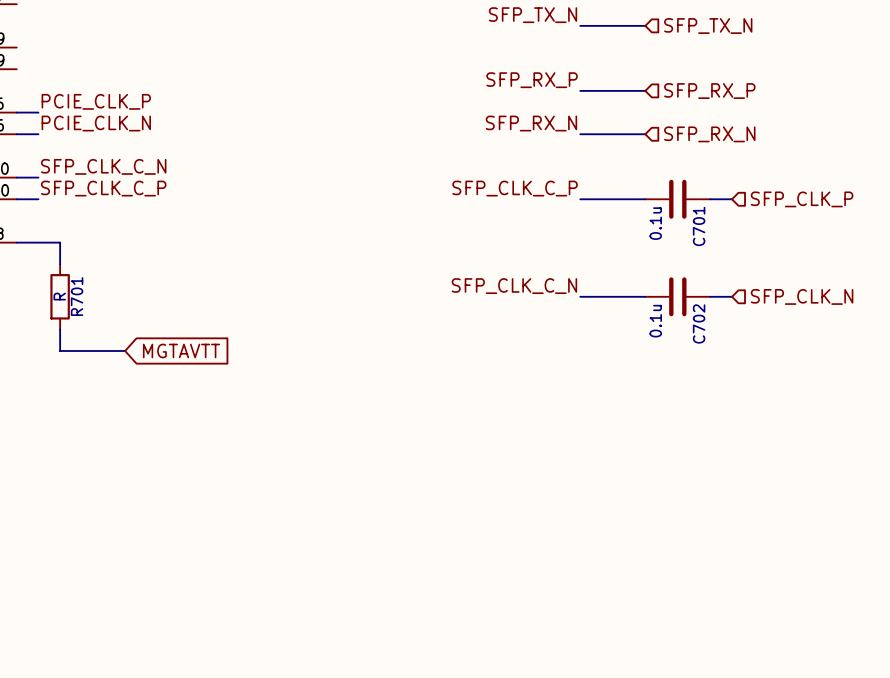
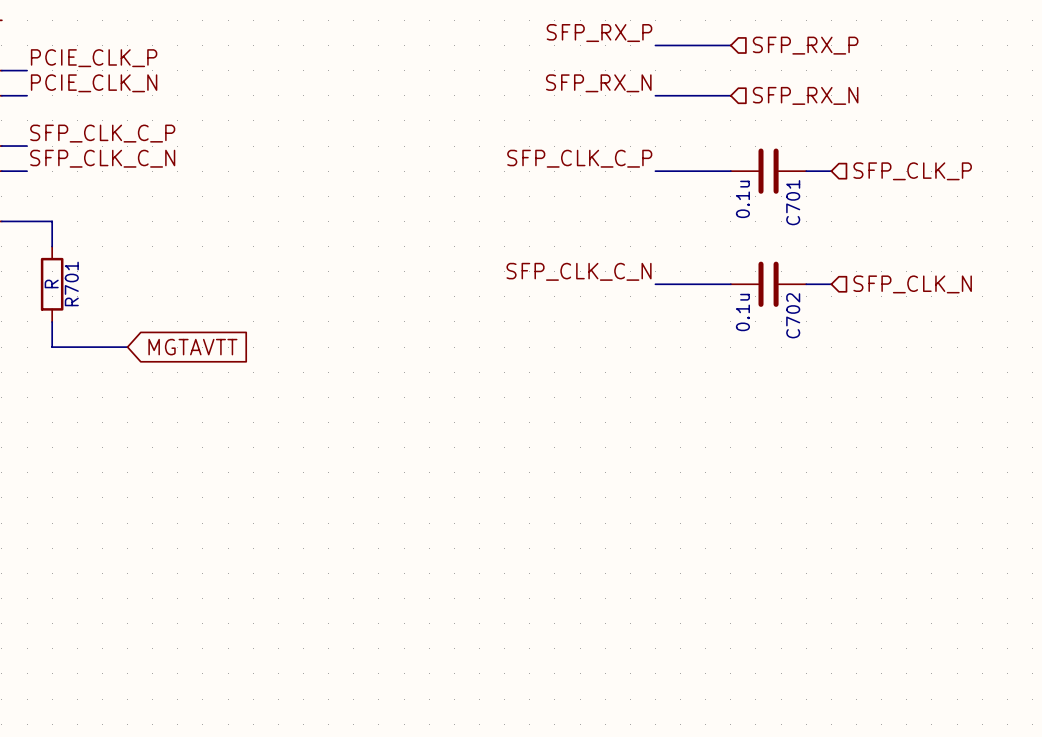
label: SFP_CLK_C_N (103, 166) -> SFP_CLK_C_P (102, 133)
label: SFP_CLK_C_P (103, 188) -> SFP_CLK_C_N (102, 158)

